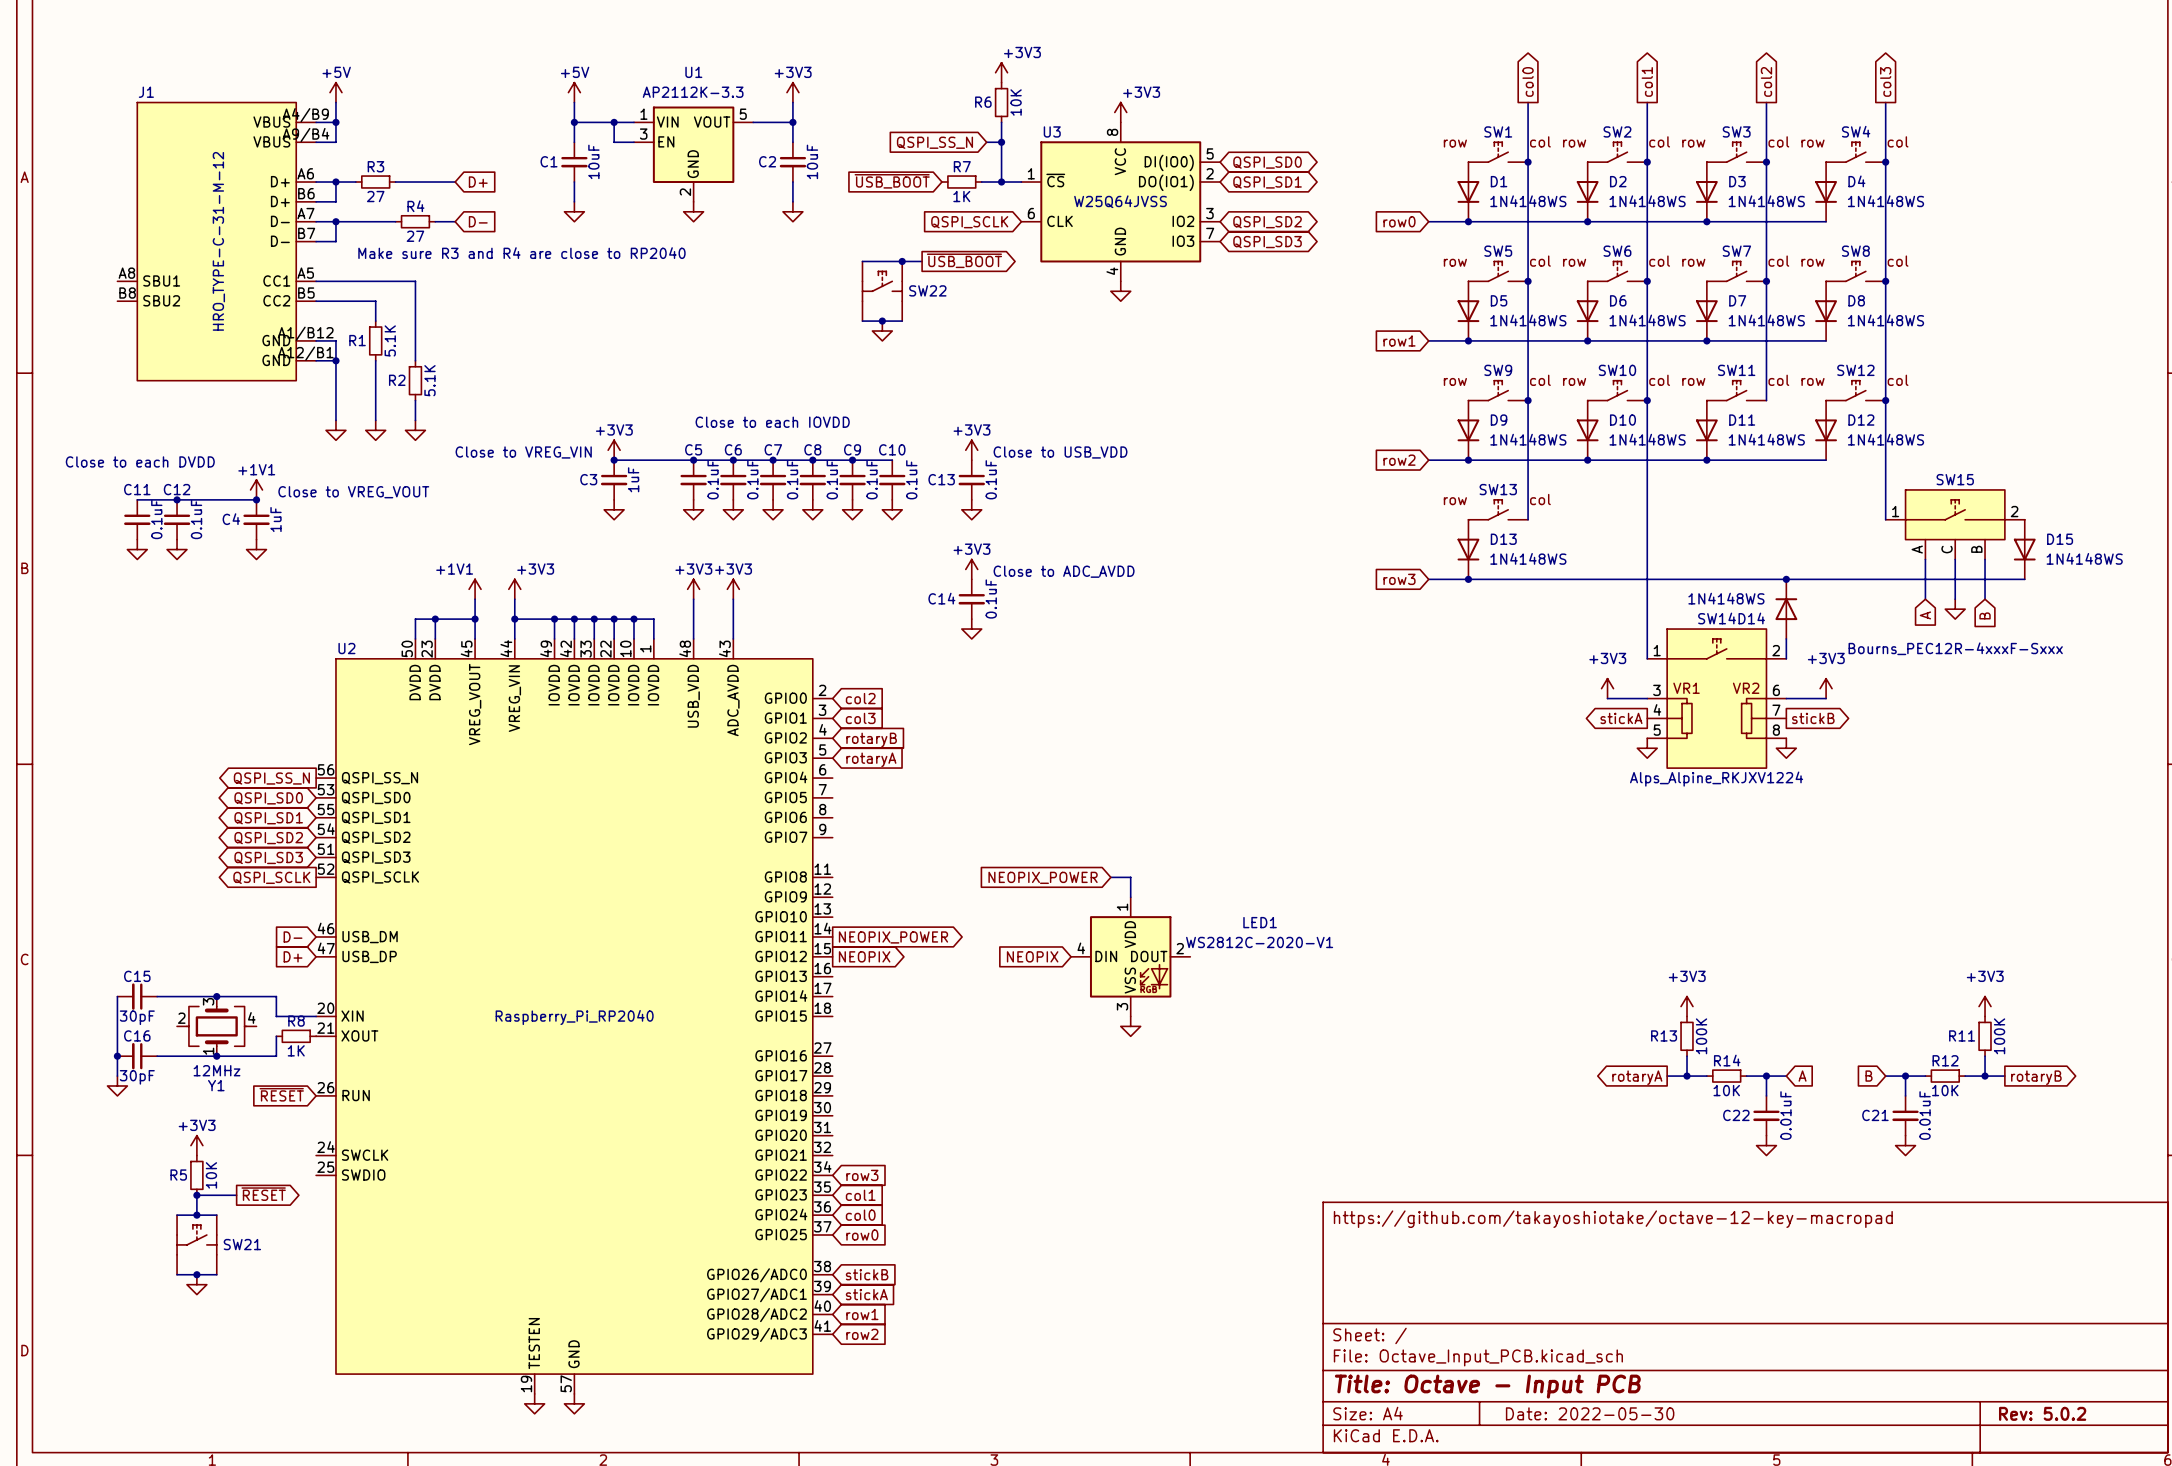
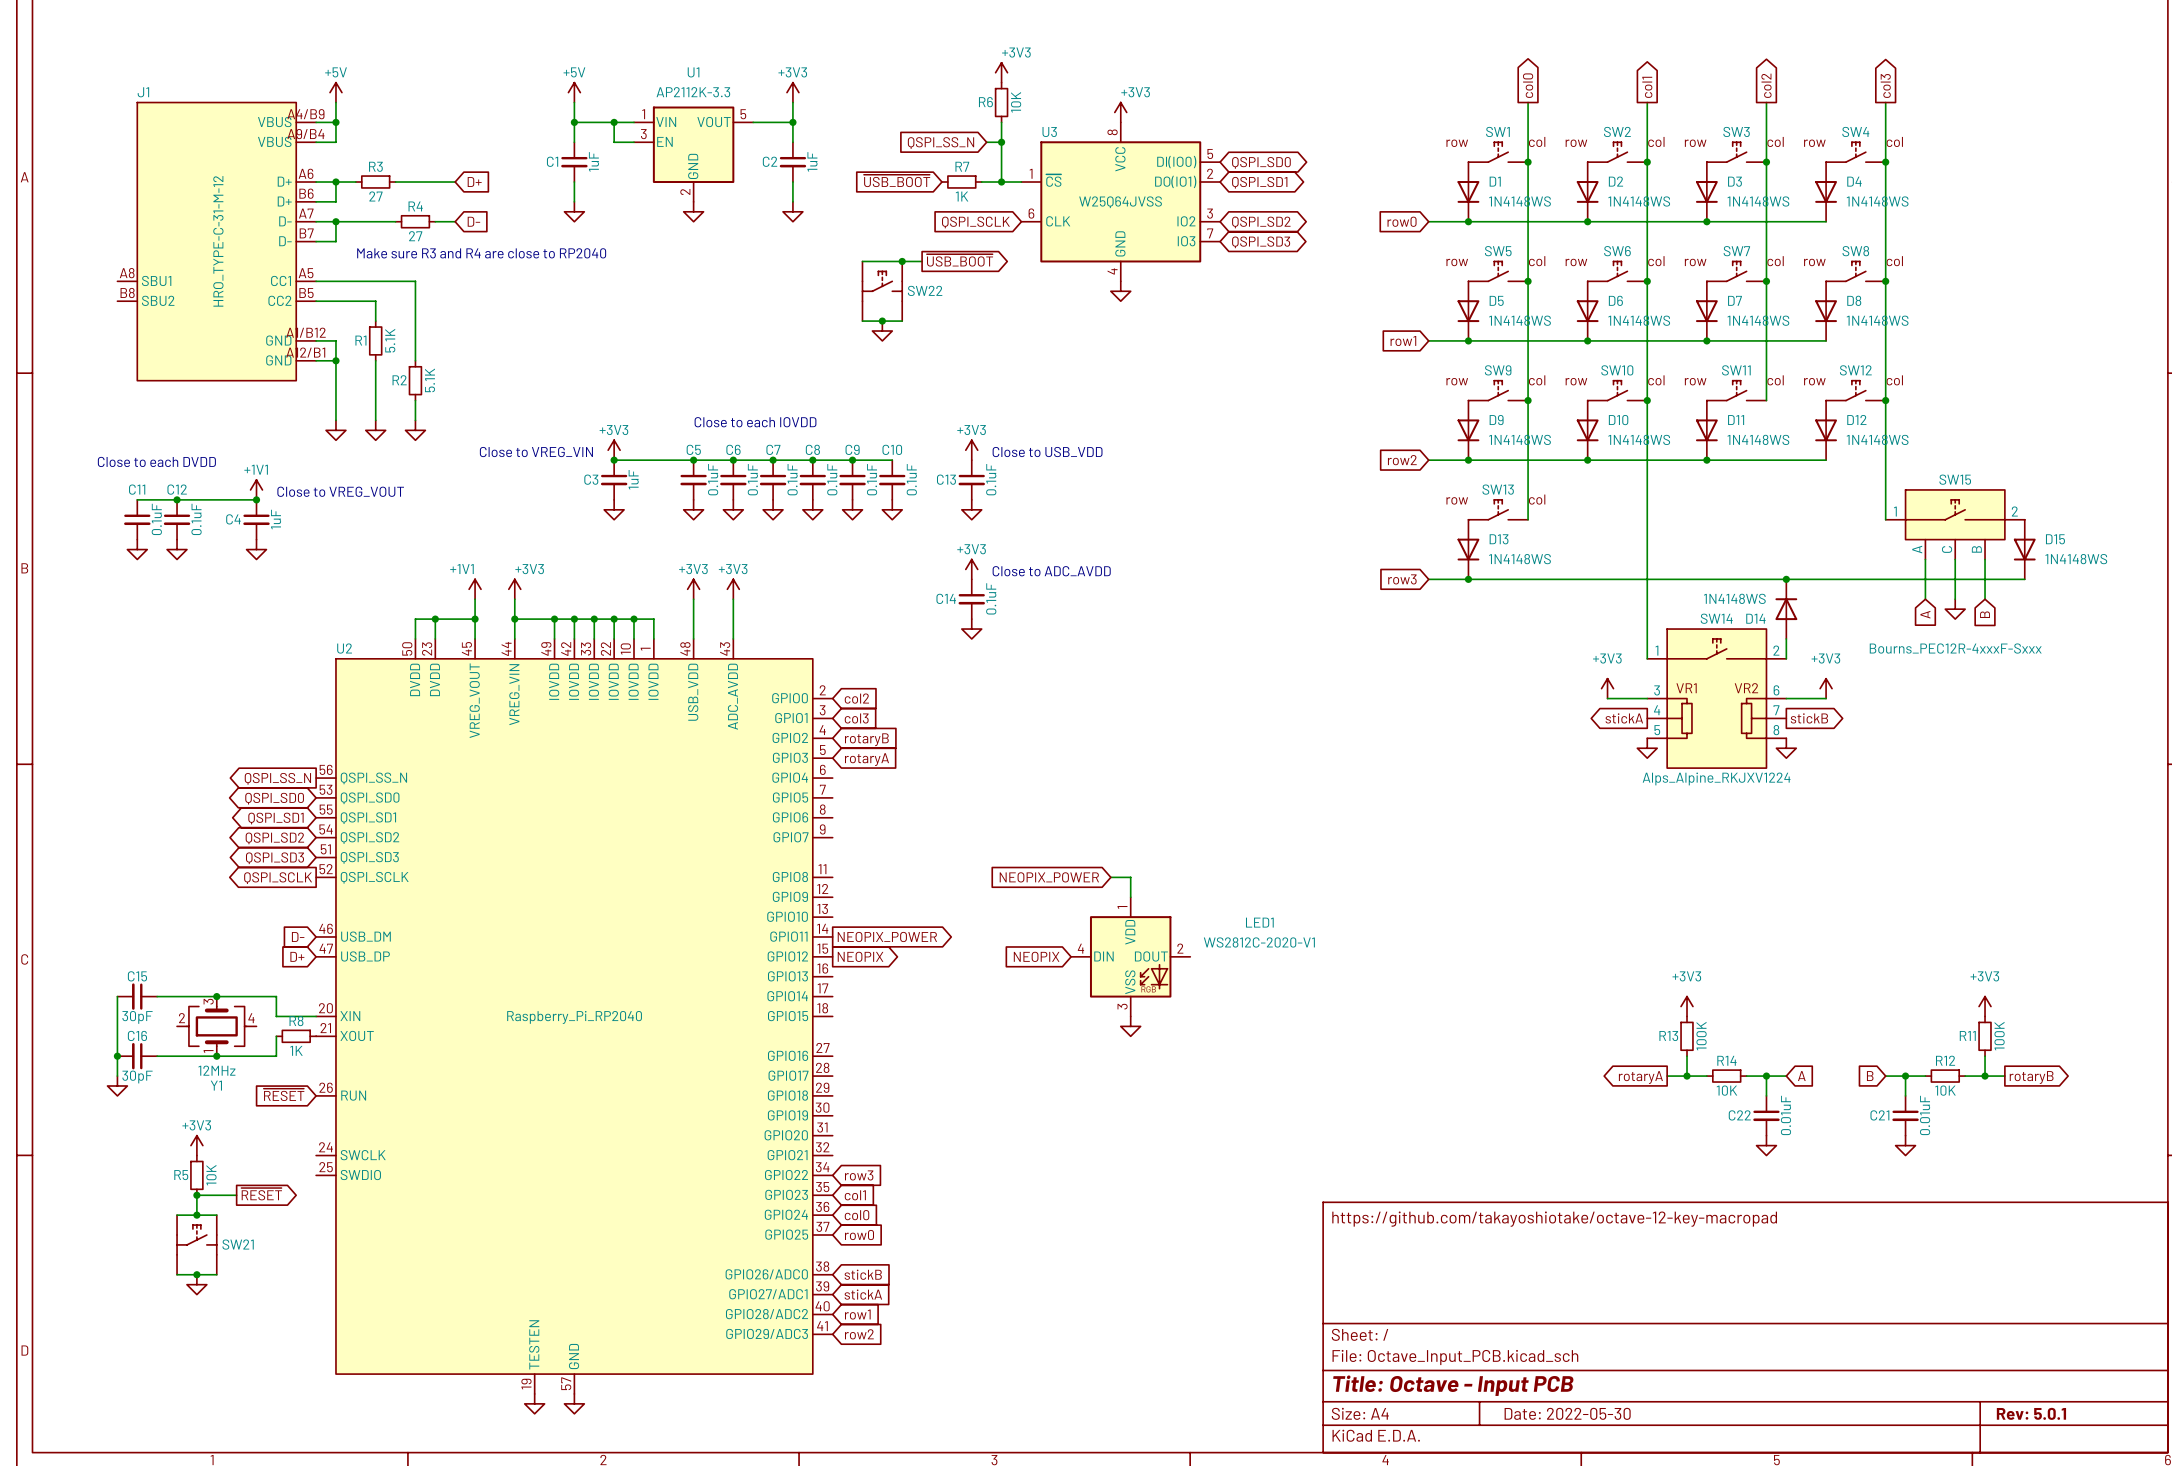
C1 value: 10uF (593, 161) -> 1uF (593, 161)
C2 value: 10uF (812, 161) -> 1uF (812, 161)
title block: Rev: 5.0.2 (2042, 1413) -> Rev: 5.0.1 (2031, 1413)

